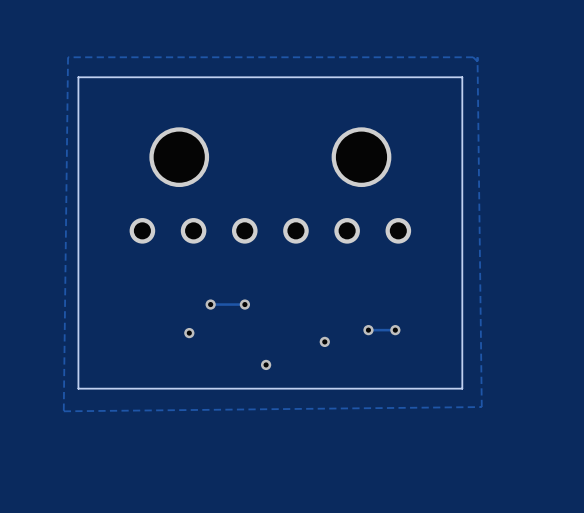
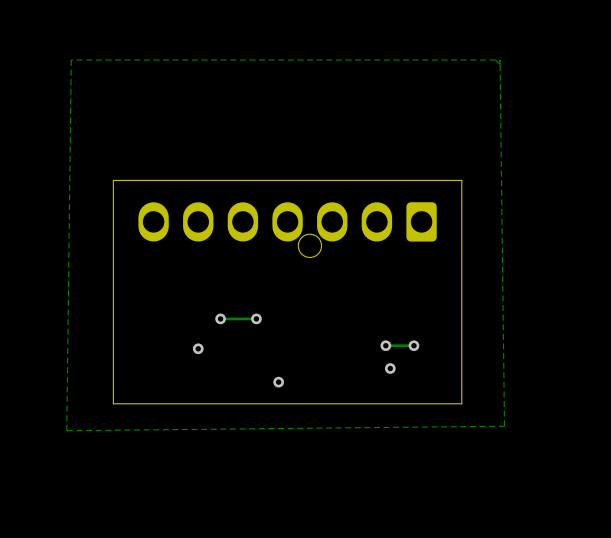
board edge: (462, 77) (78, 77) (78, 388) (462, 388) (462, 77) -> (461, 180) (461, 403) (113, 403) (113, 180) (461, 180)
part: (270, 185) -> none
part: none -> (287, 229)
via position: (324, 341) -> (390, 368)

